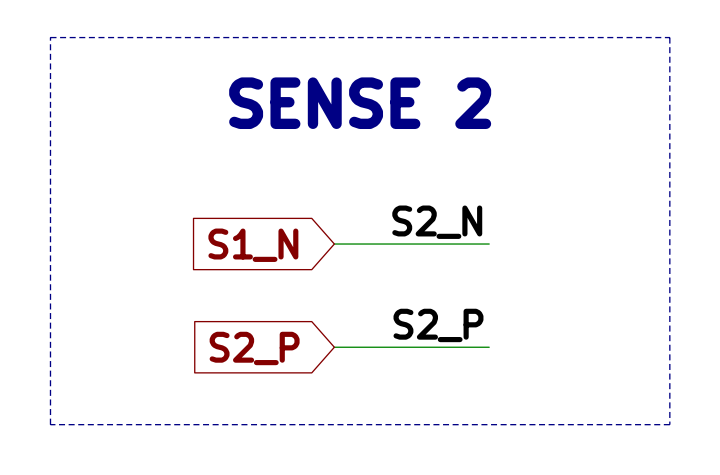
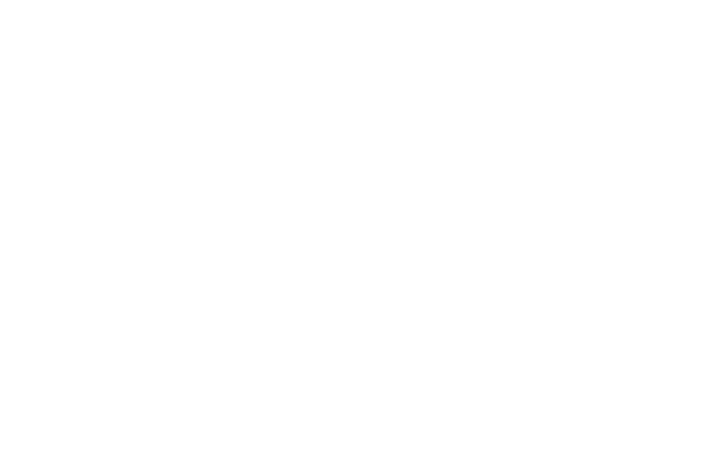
line: (50, 37) (50, 424) (669, 424) (669, 37) (50, 37) -> none
text: SENSE 2 (360, 103) -> none
label: S2_N (437, 222) -> none
wire: (334, 244) (489, 244) -> none
global label: S1_N (253, 245) -> none
label: S2_P (438, 325) -> none
wire: (334, 347) (489, 347) -> none
global label: S2_P (254, 348) -> none

